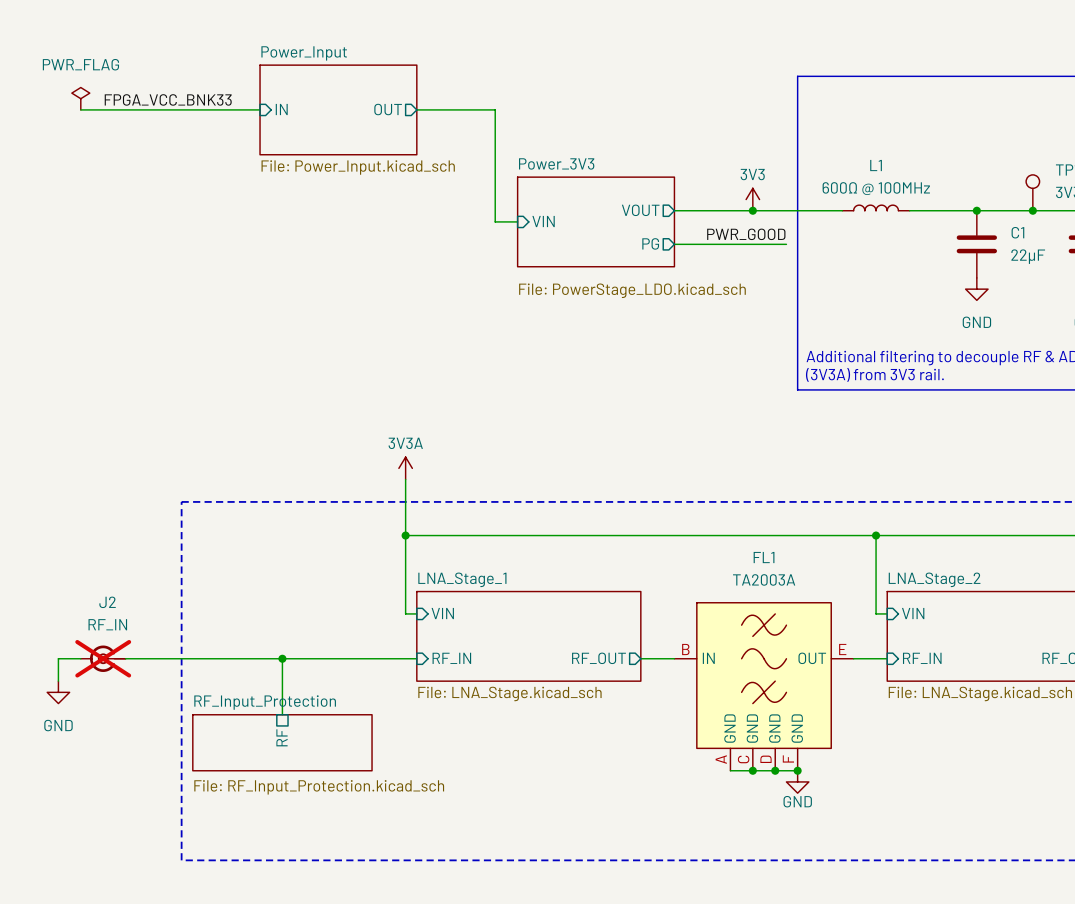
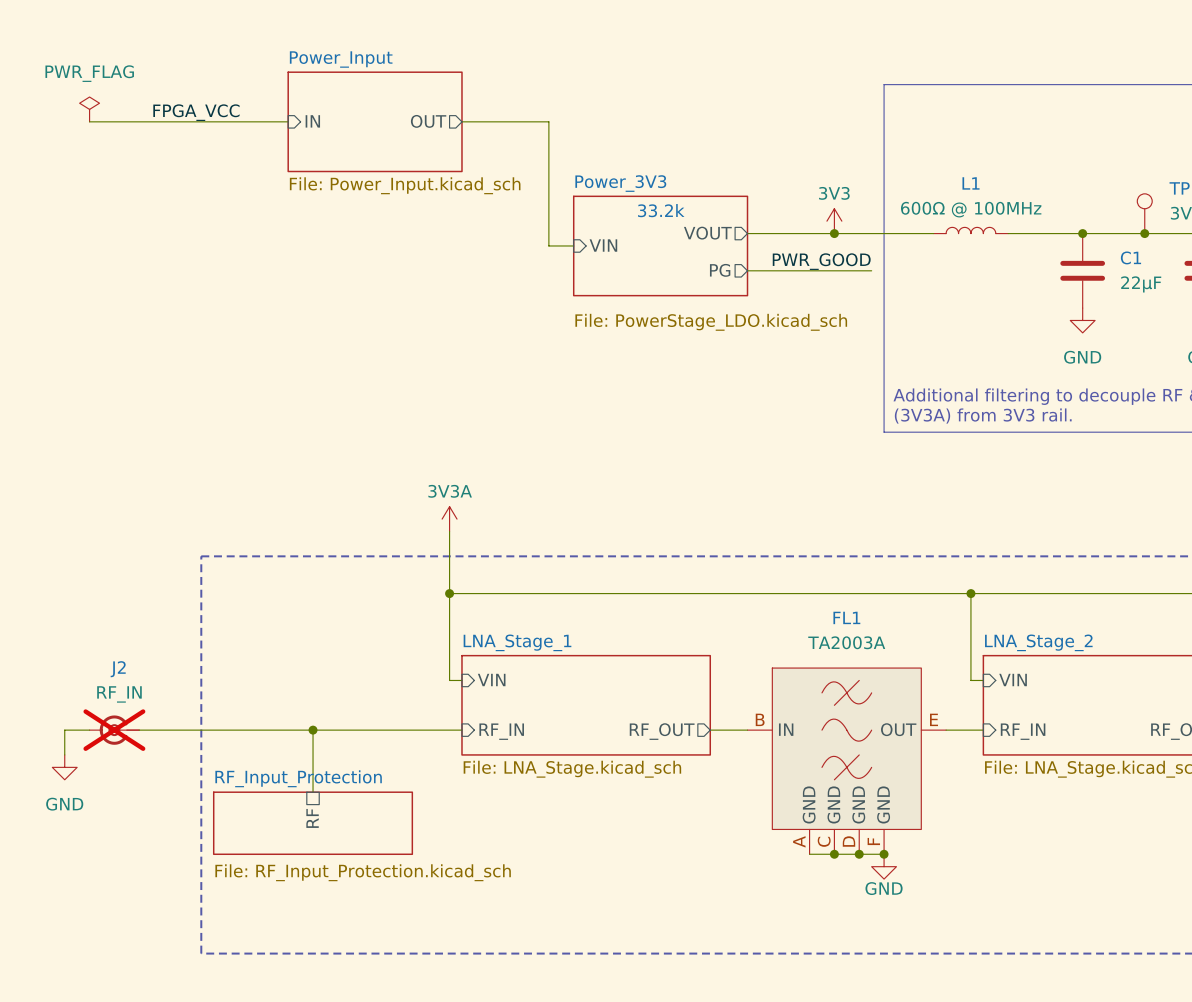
label: FPGA_VCC_BNK33 (168, 99) -> FPGA_VCC (196, 112)
sheet Power_3V3 text: none -> 33.2k (661, 210)

